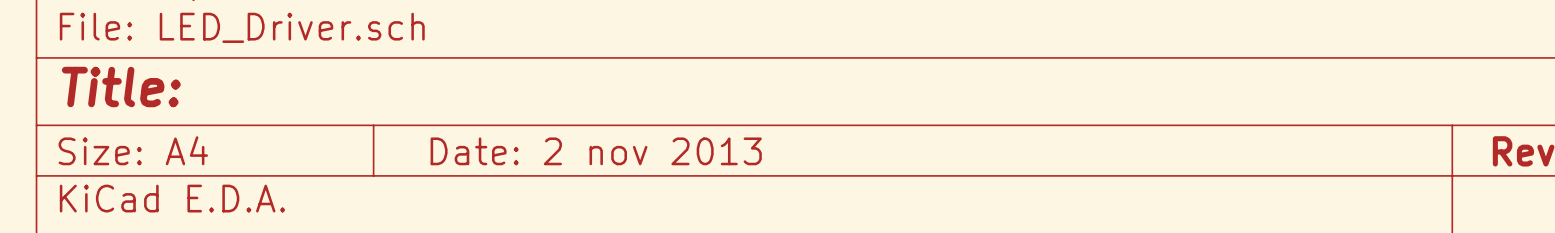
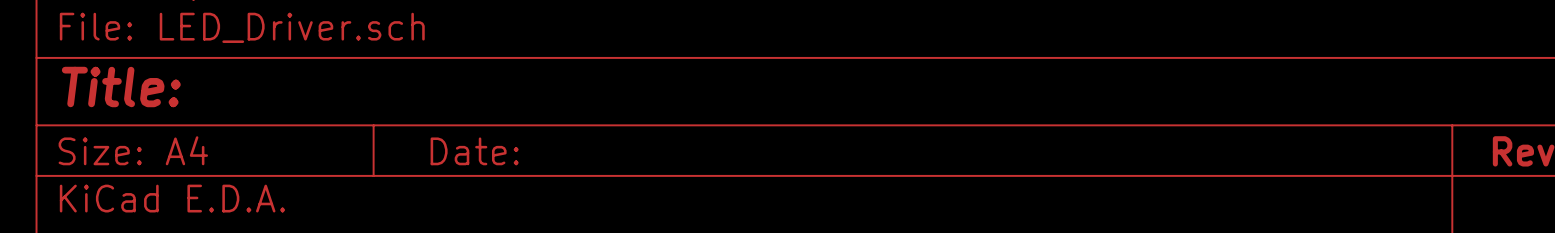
title block: Date: 2 nov 2013 (596, 151) -> Date: (474, 151)

